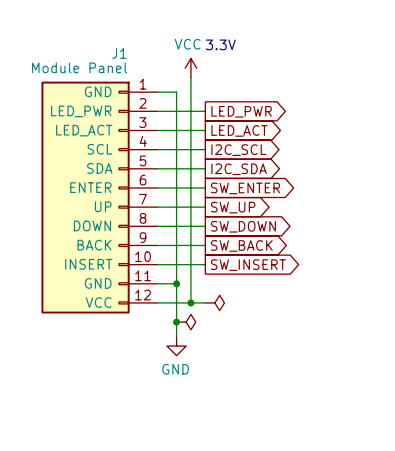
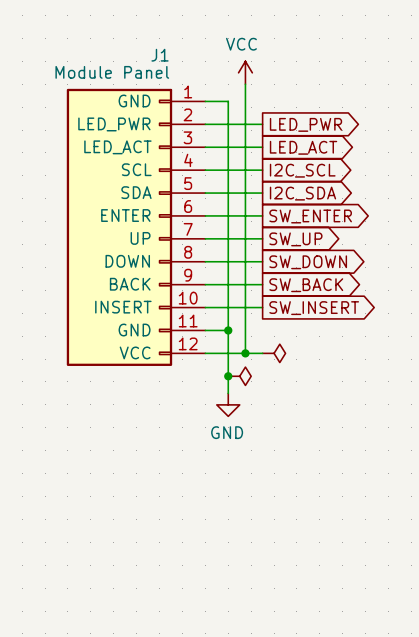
text: 3.3V (220, 44) -> none

